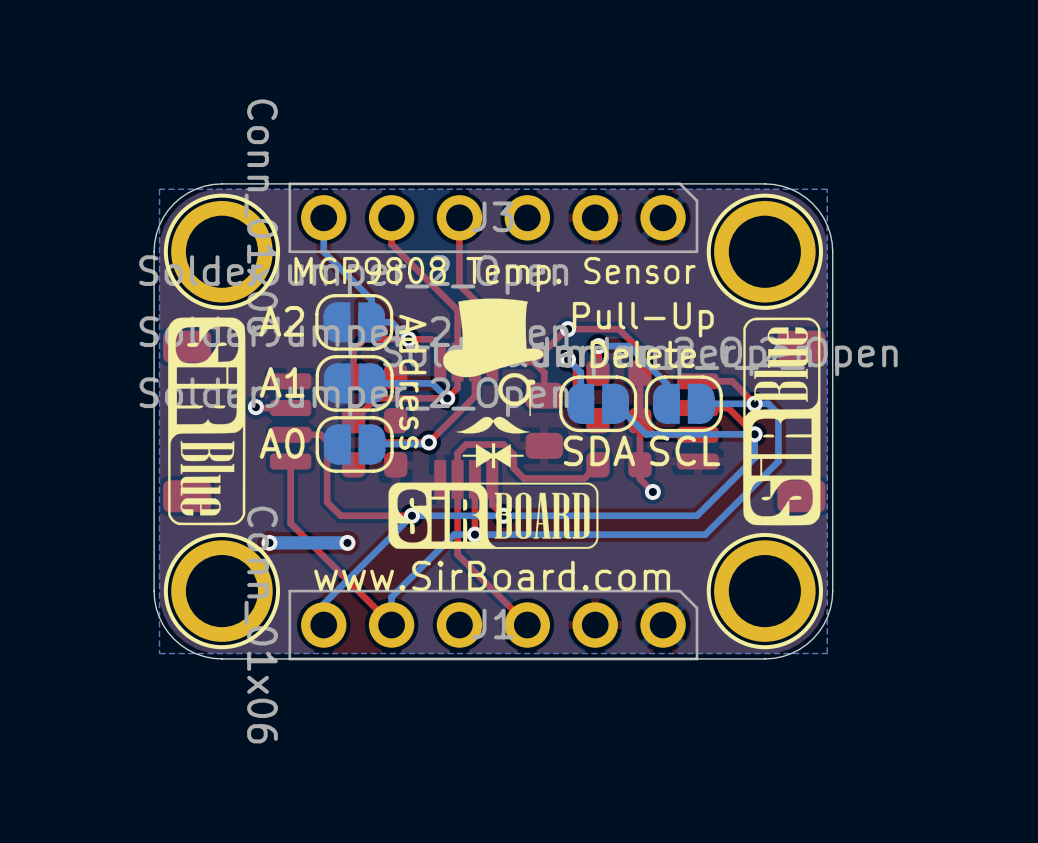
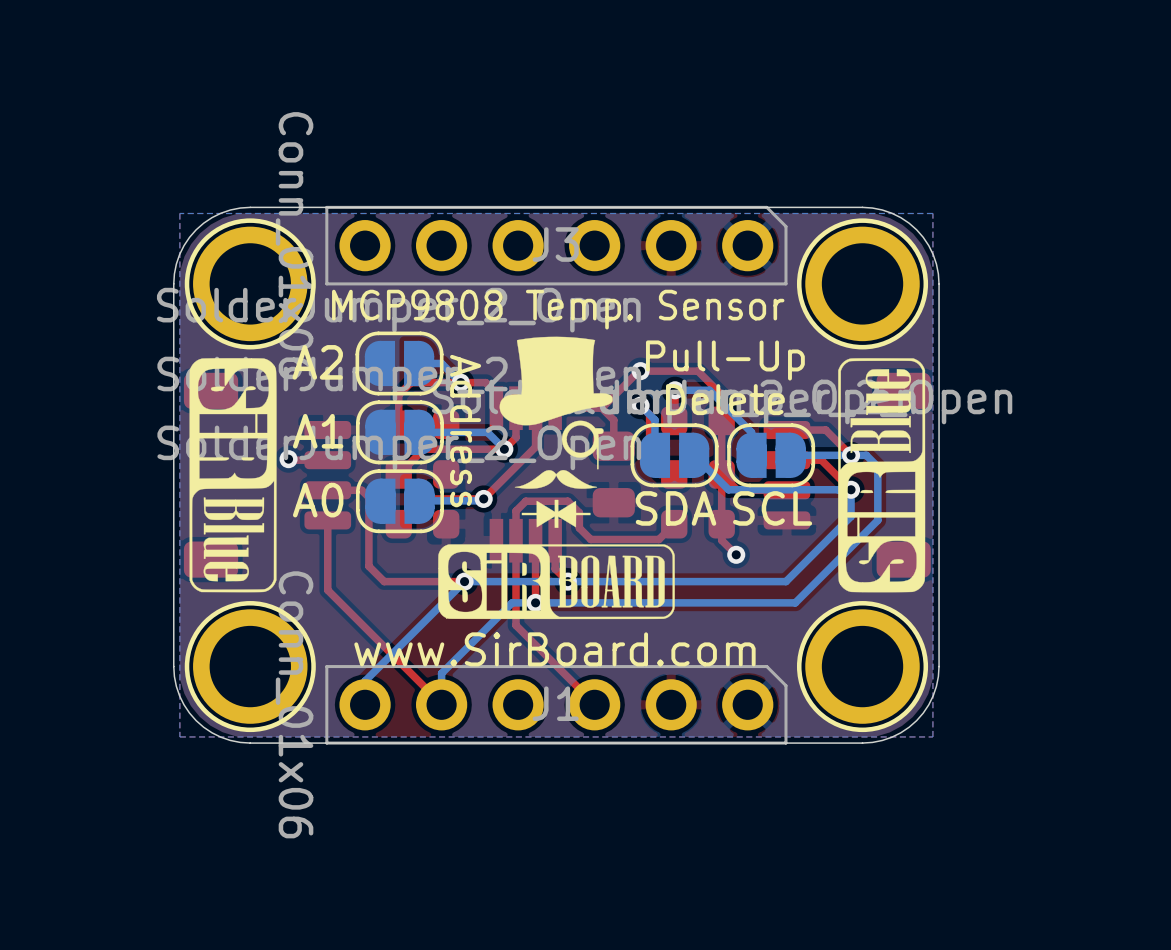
bottom track: (323, 217) (323, 251) (371, 299) (371, 322) -> none
top track: (391, 217) (391, 244) (457, 310) (457, 361) -> none
top track: (459, 217) (459, 285) (474, 300) (474, 361) -> none
via: (269, 542) -> none
bottom track: (347, 542) (269, 542) -> none
via: (347, 542) -> none

